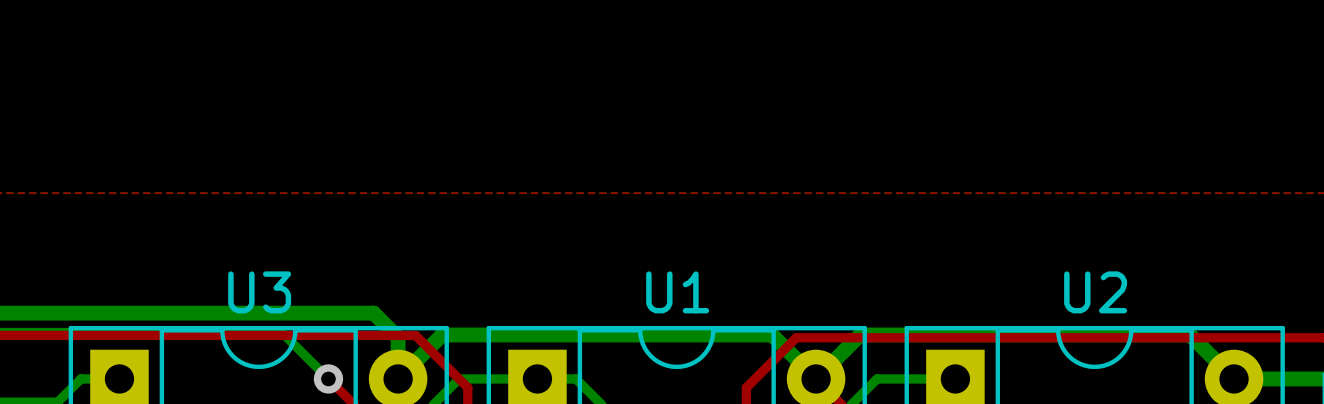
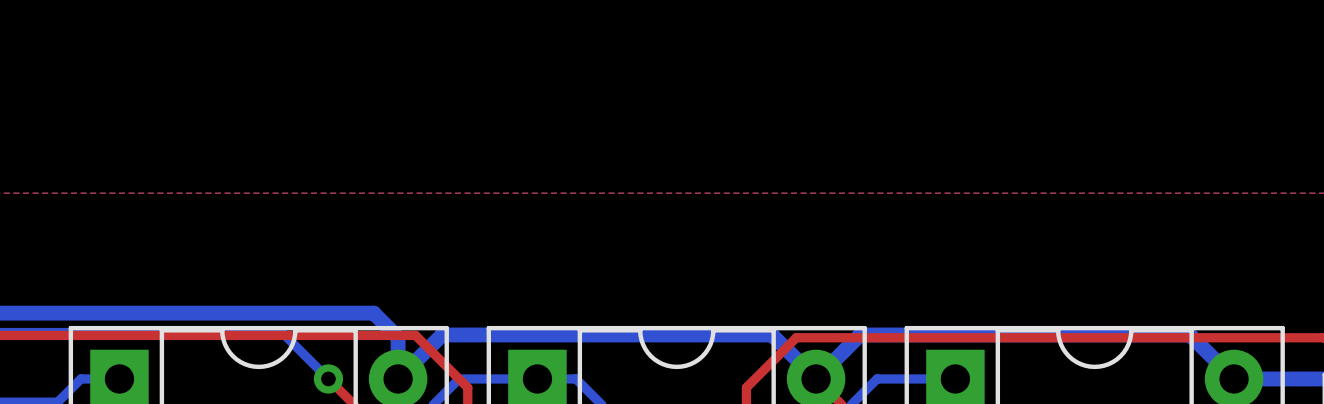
U3 name: U3 (259, 292) -> none
U1 name: U1 (677, 292) -> none
U2 name: U2 (1095, 292) -> none

